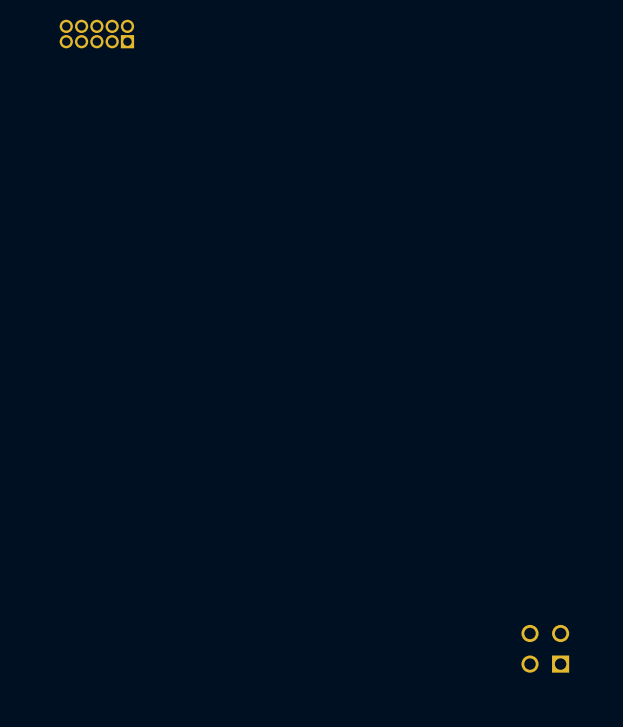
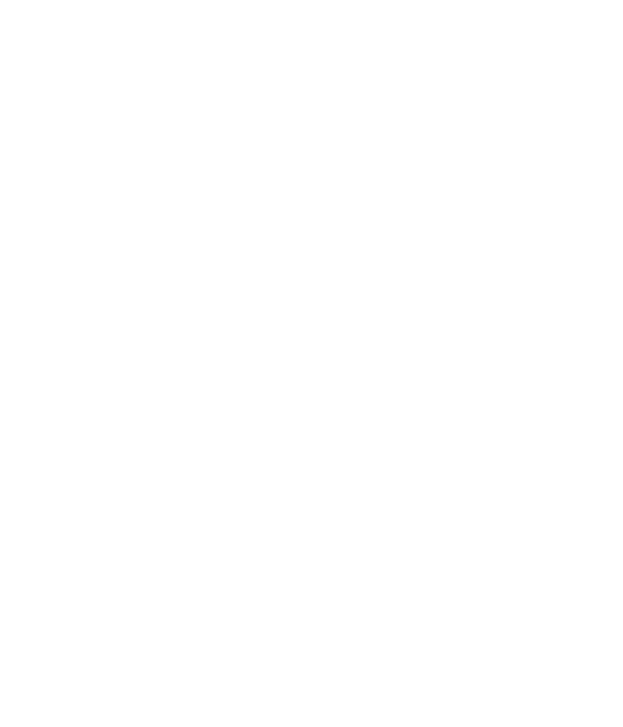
part: (96, 34) -> none
part: (545, 648) -> none

